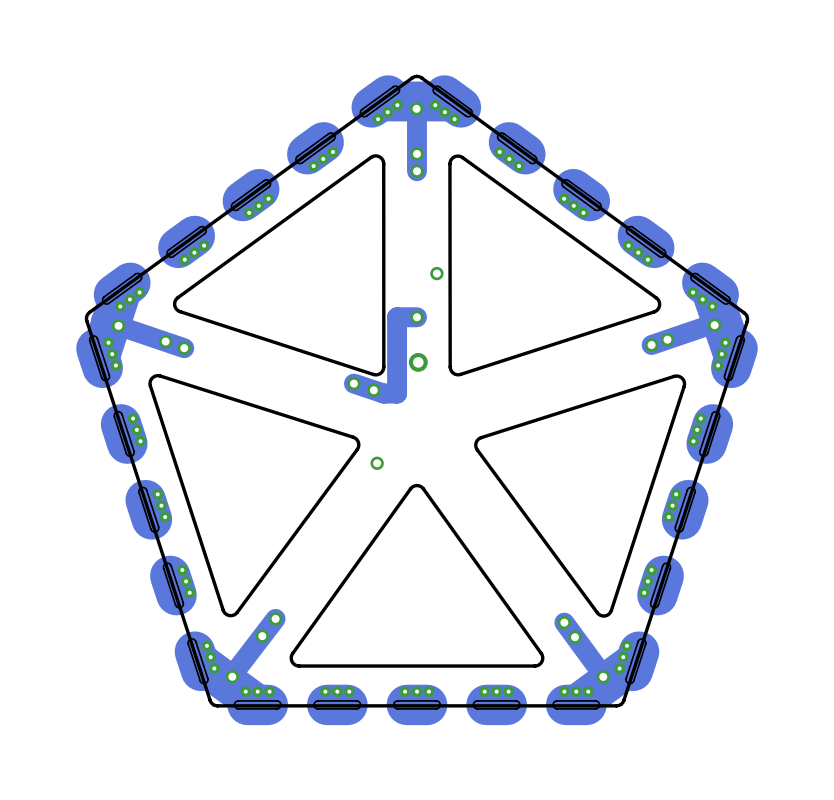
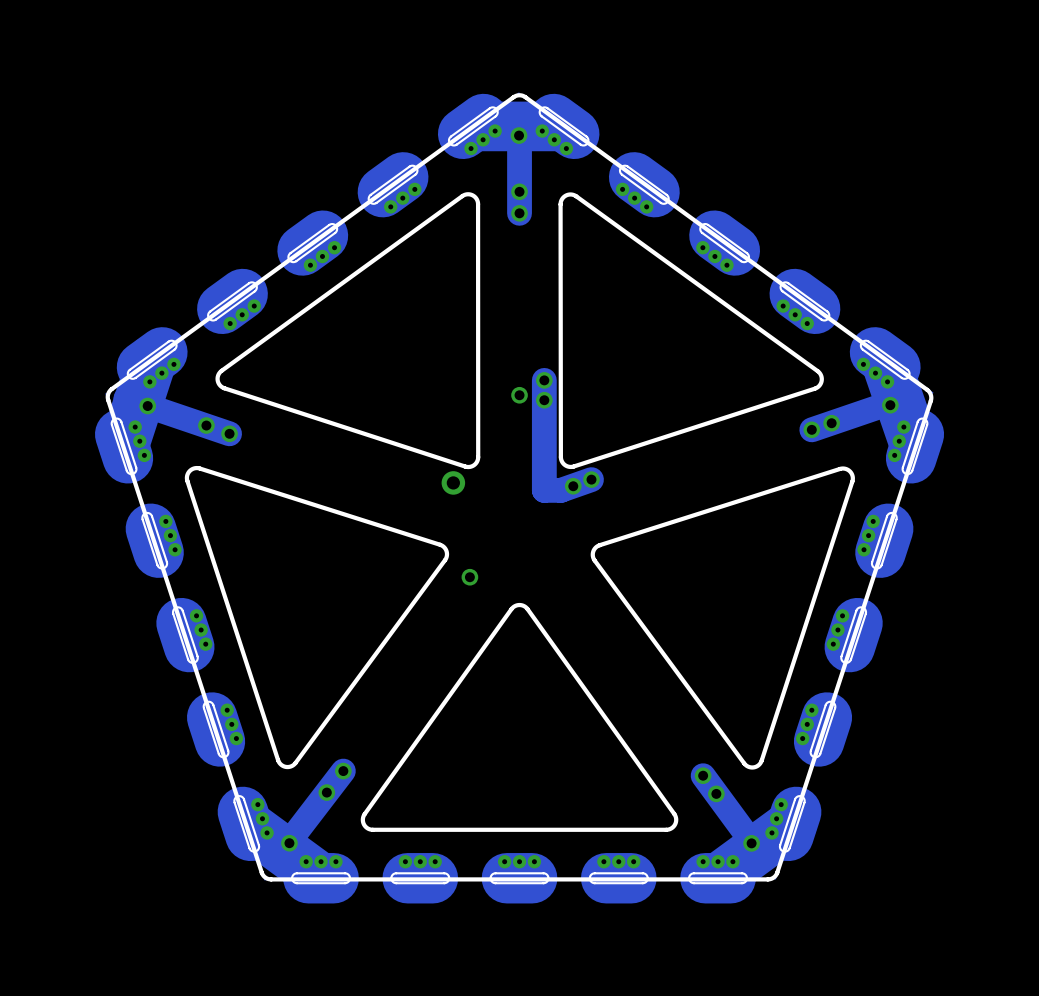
via: (436, 273) -> none
track: none -> (544, 380) (544, 490) (560, 490) (591, 479)
via: none -> (544, 380)
track: (416, 317) (397, 317) (397, 393) (383, 393) (353, 383) -> none
via: none -> (544, 400)
via position: (418, 362) -> (453, 482)
via: (353, 383) -> none
via: none -> (591, 479)
via: (373, 390) -> none
via: none -> (573, 486)

